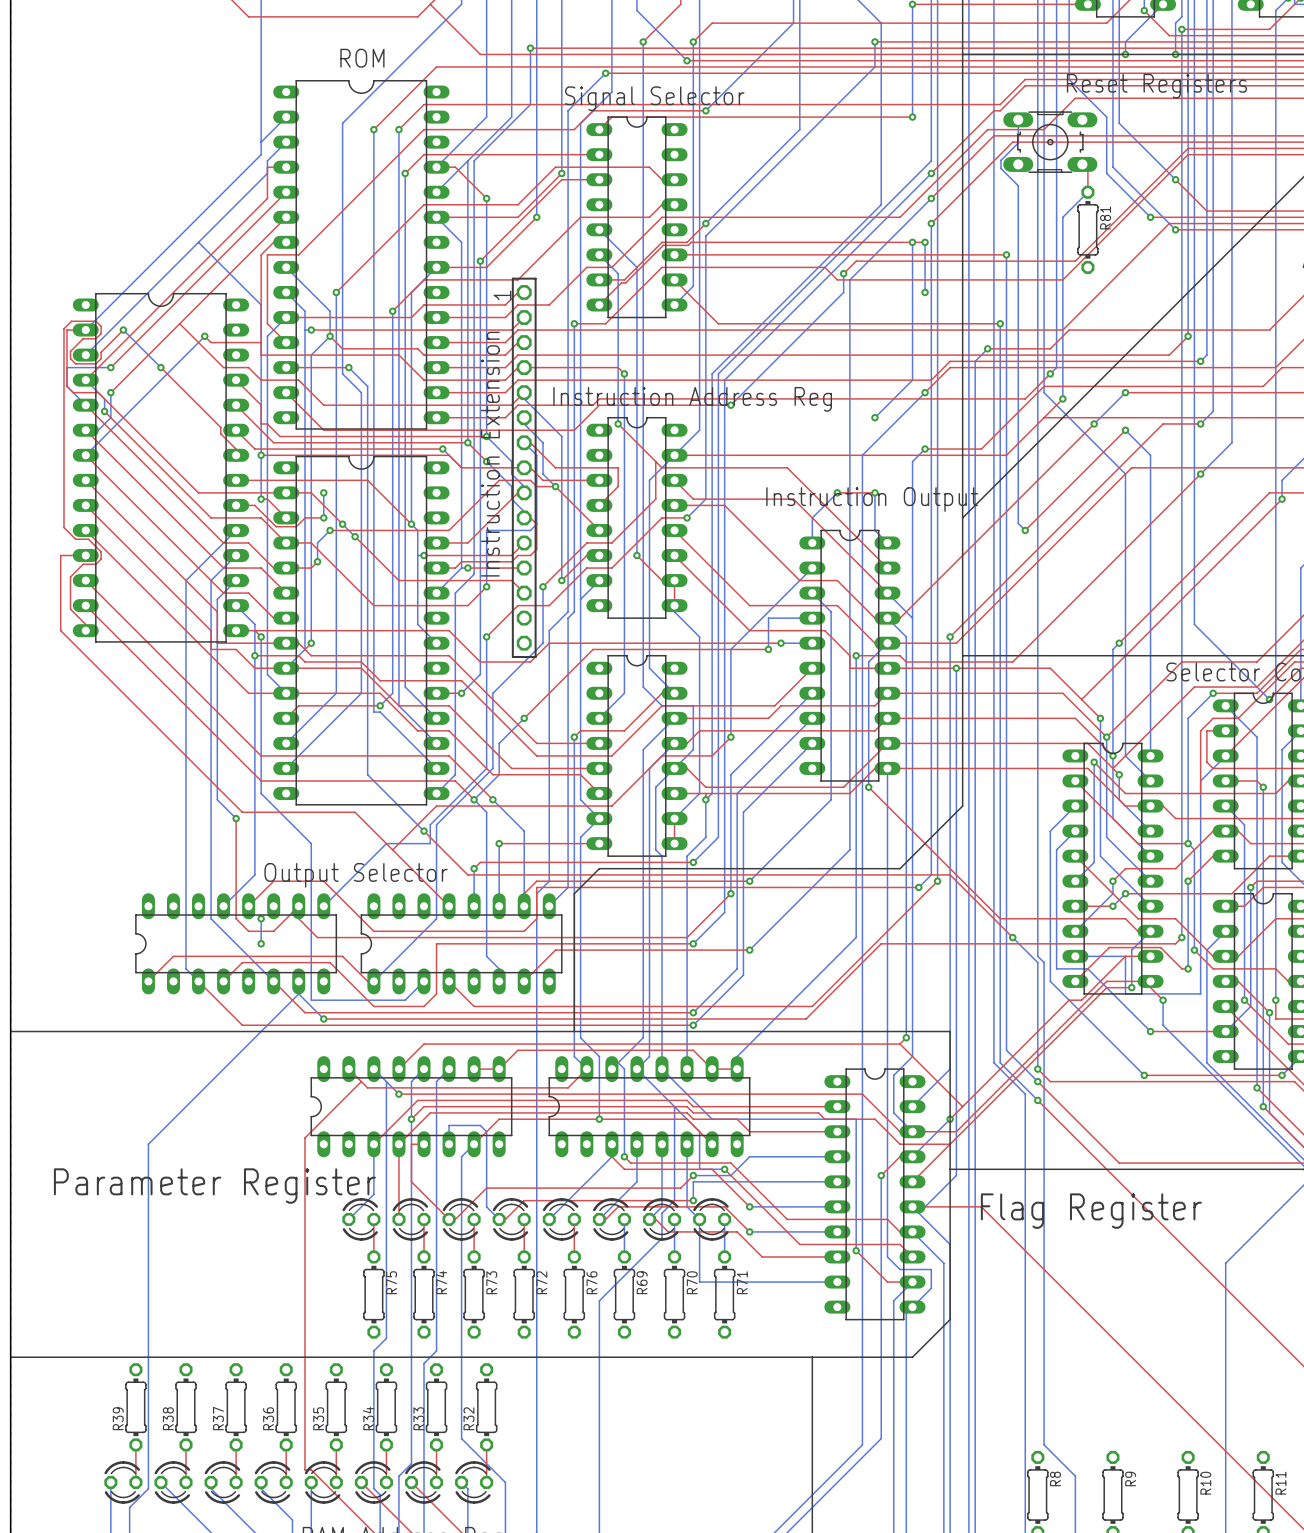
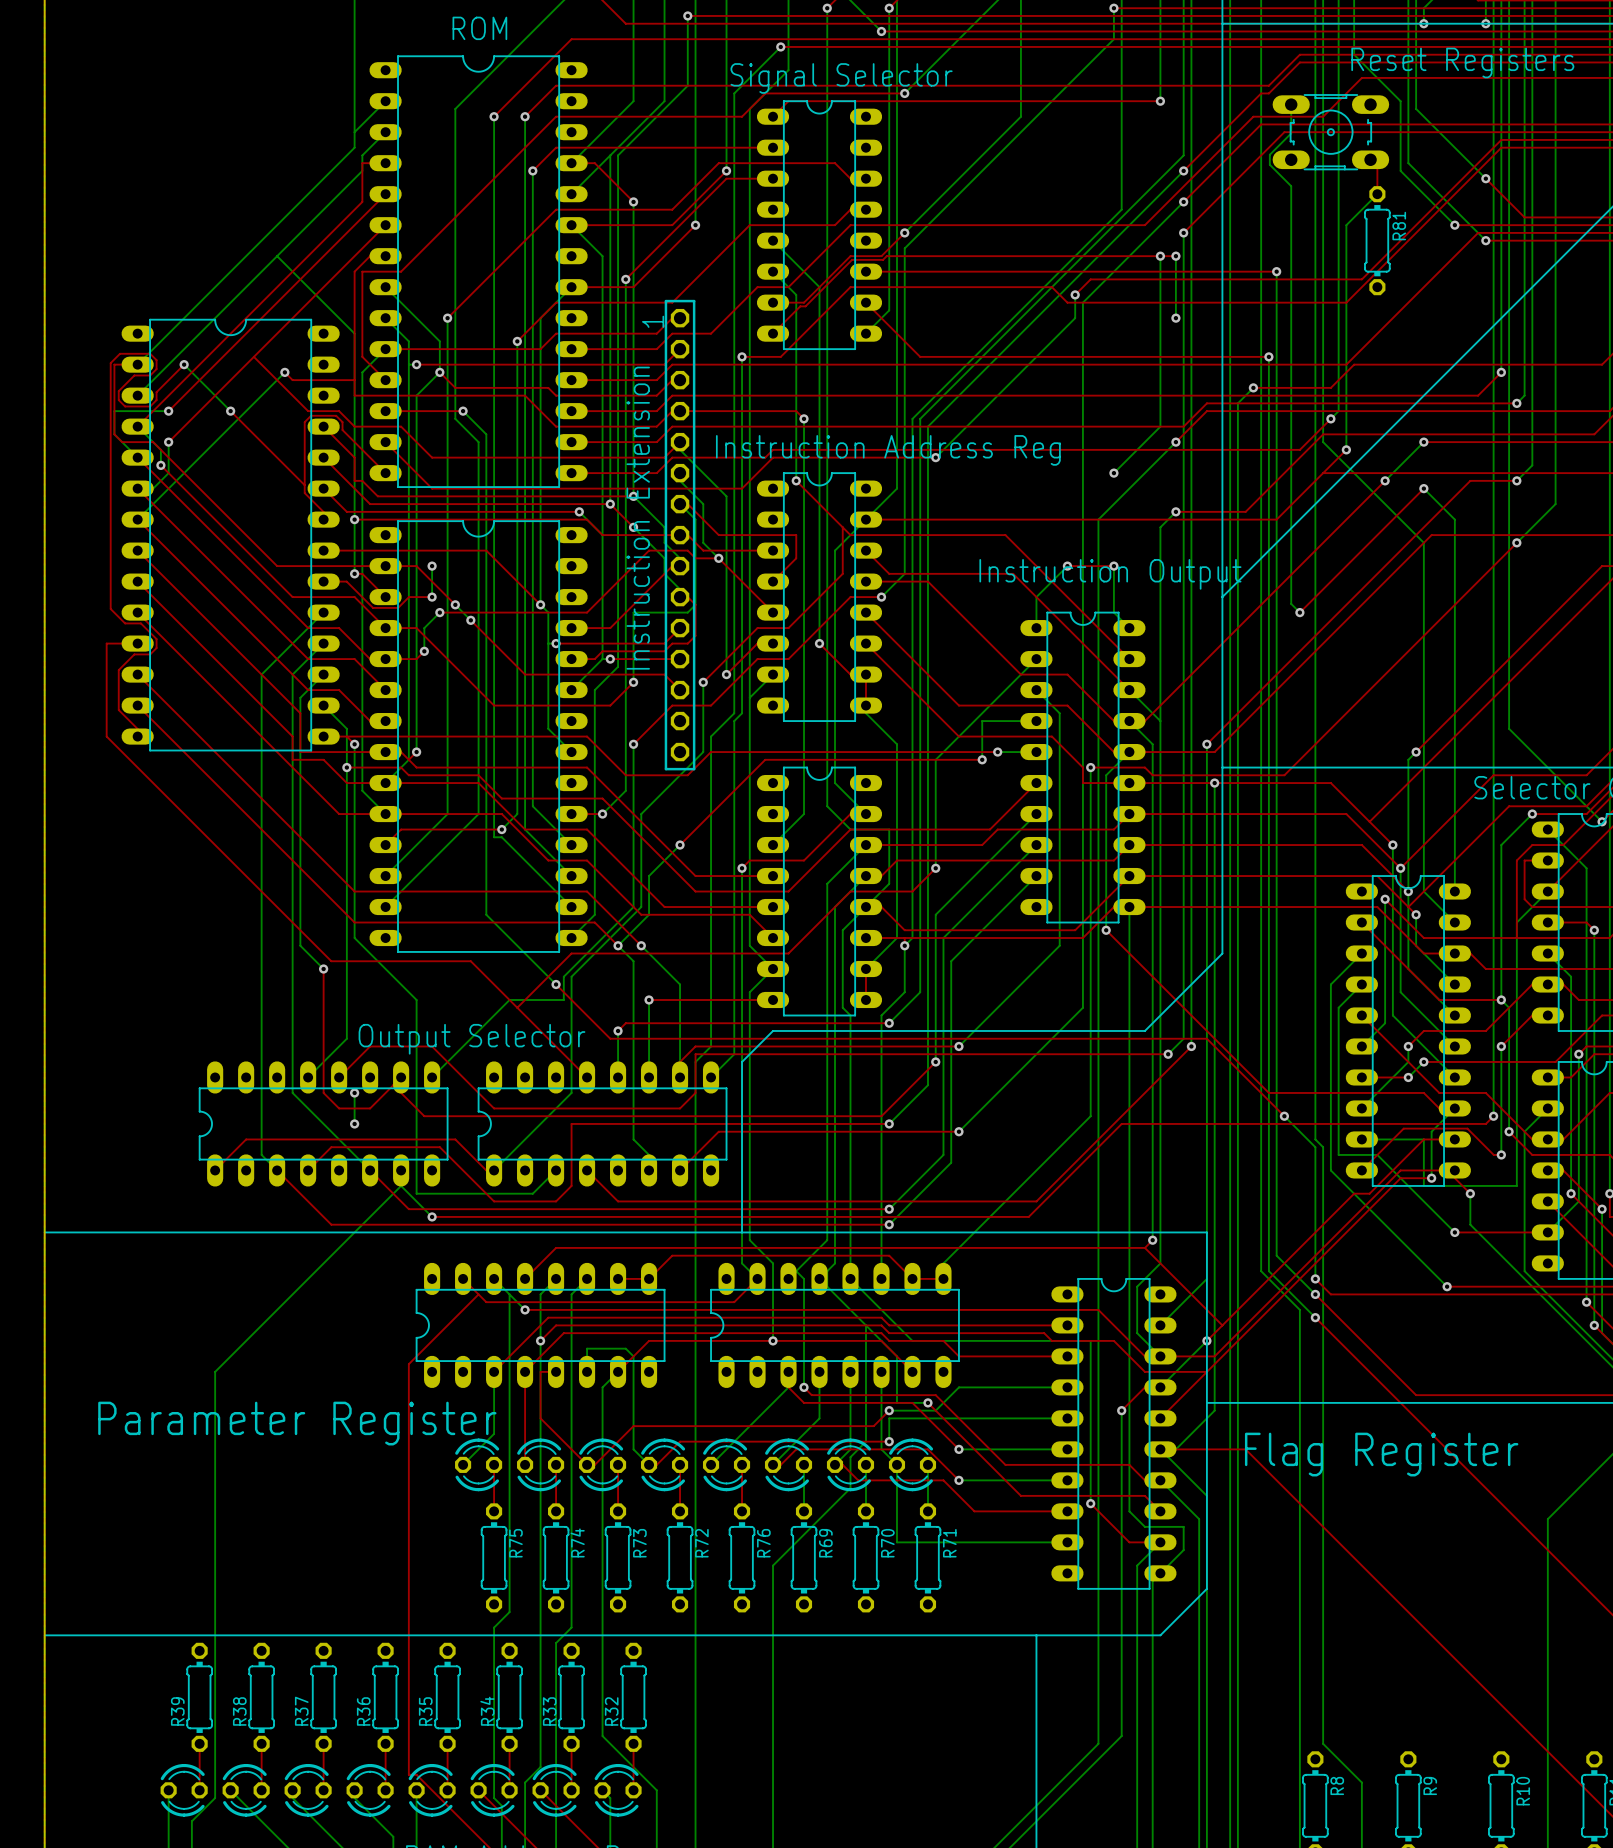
top track: none -> (385, 473) (342, 430) (342, 422) (336, 415) (311, 415) (304, 422) (304, 485)

